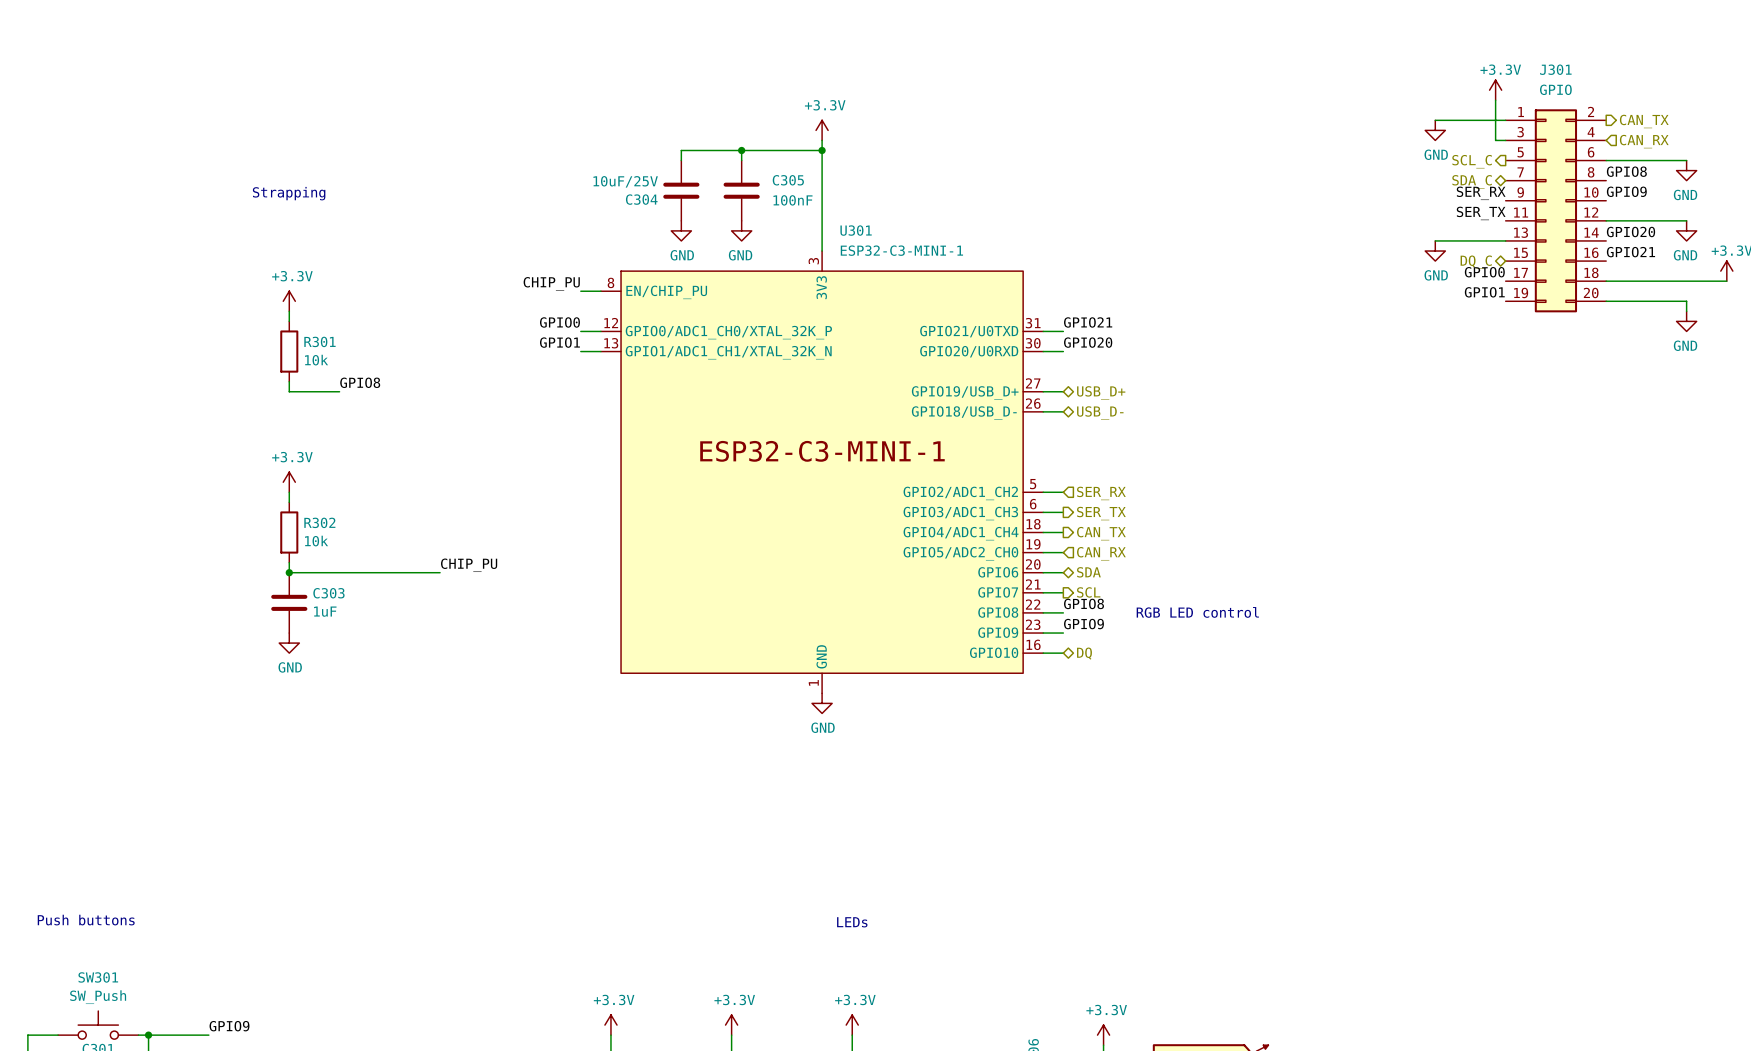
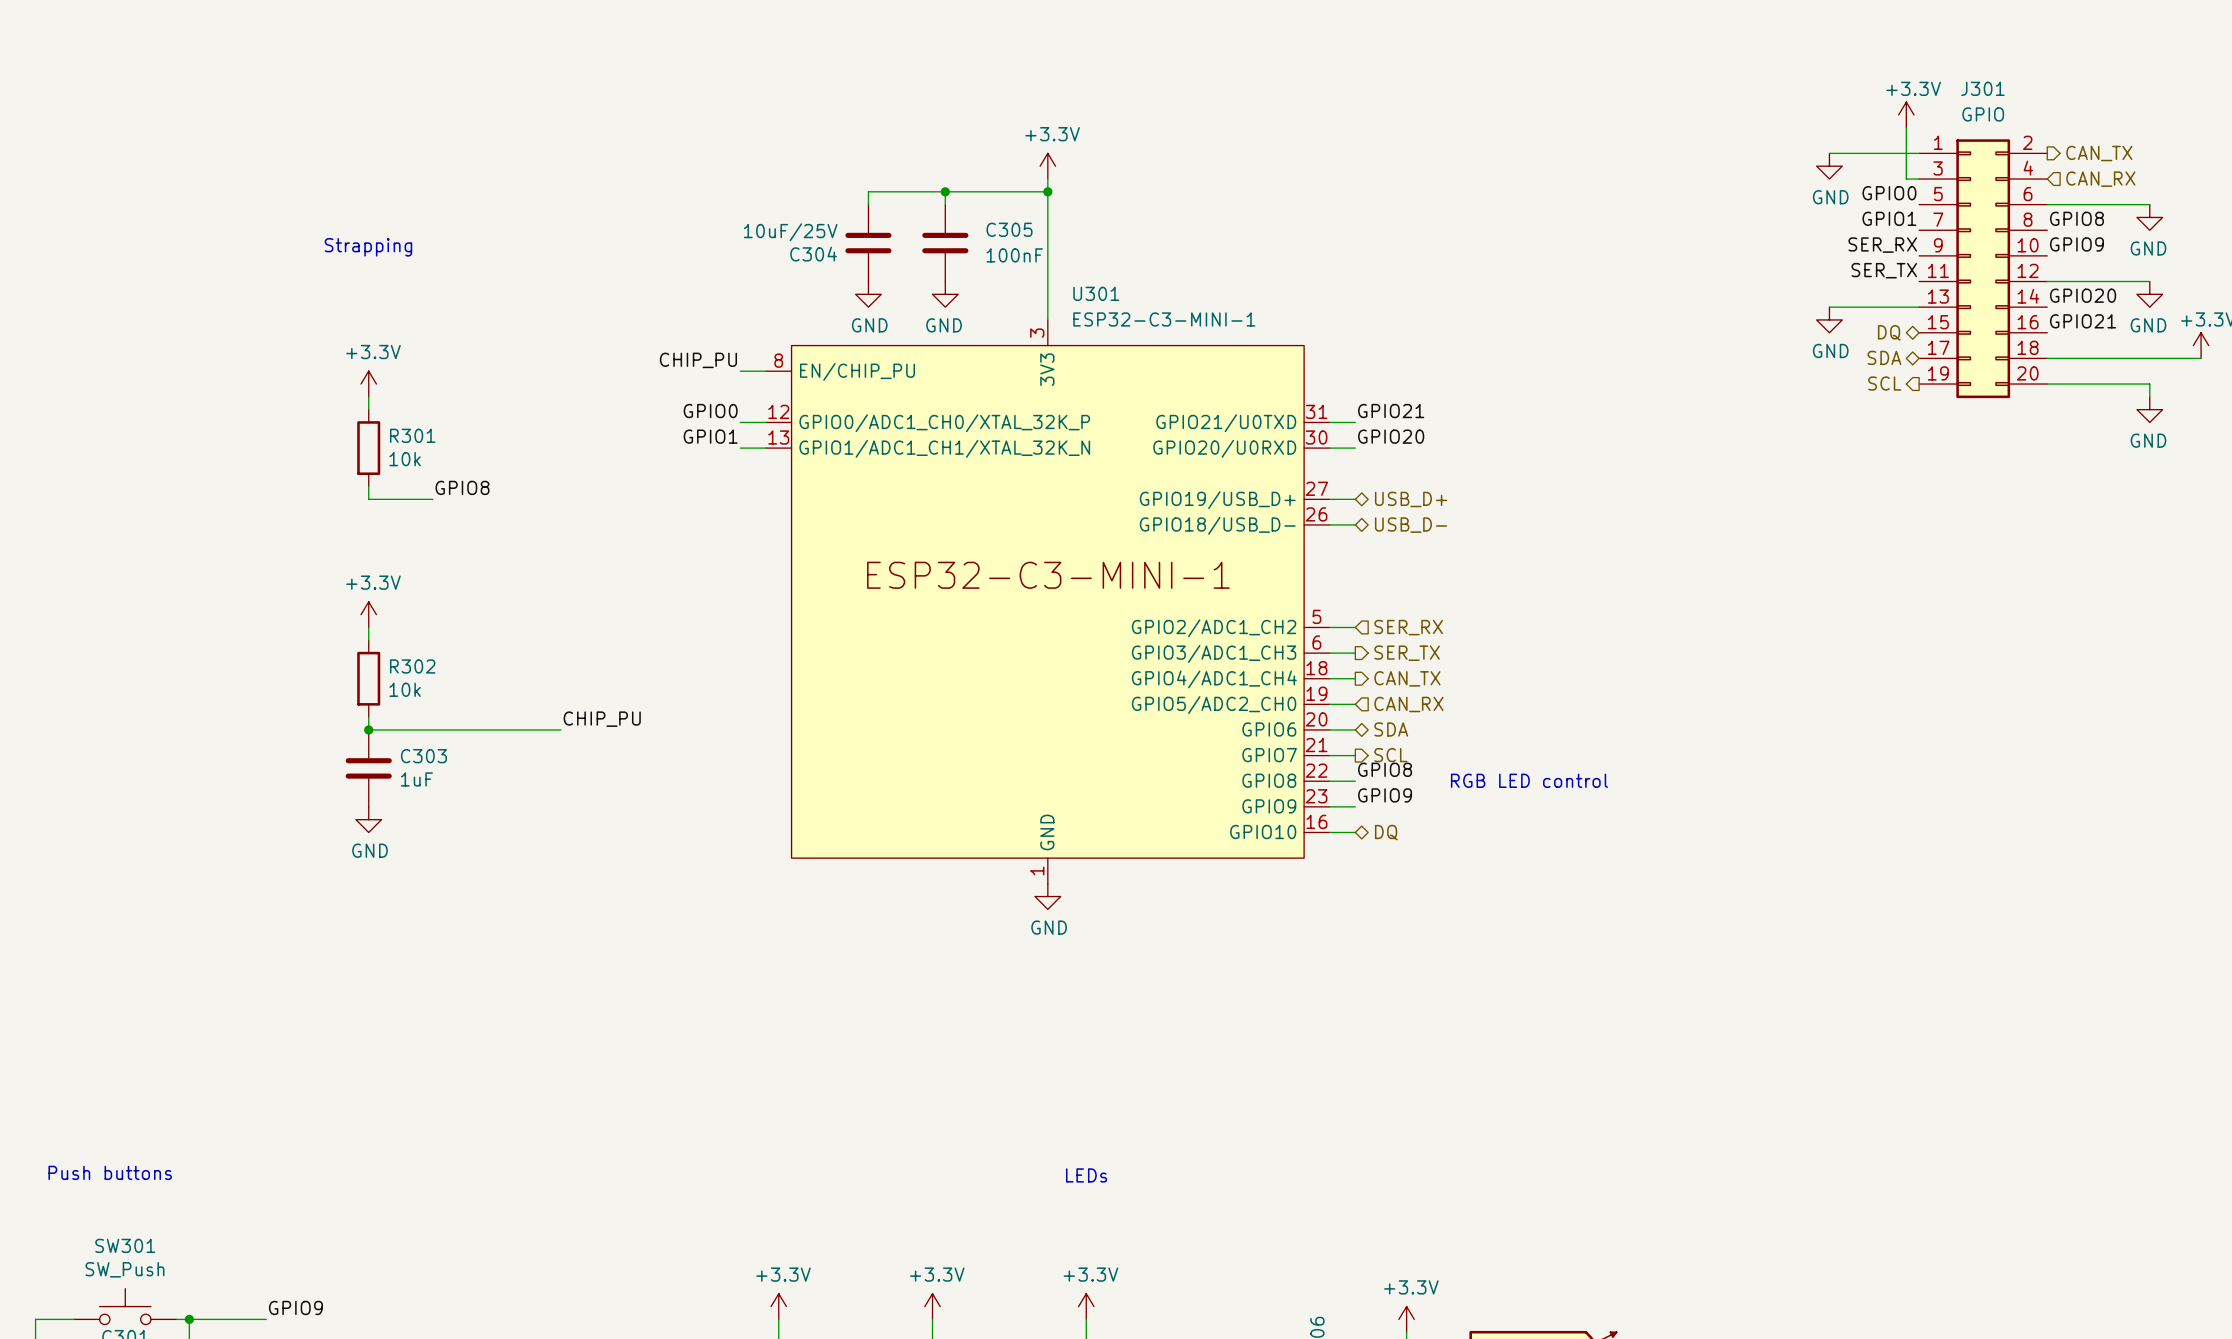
hierarchical label: SCL_C (1472, 161) -> none
hierarchical label: SDA_C (1472, 181) -> none
hierarchical label: DQ_C (1476, 262) -> DQ (1889, 332)
label position: GPIO0 (1484, 272) -> GPIO0 (1889, 193)
hierarchical label: none -> SDA (1884, 357)
label position: GPIO1 (1484, 292) -> GPIO1 (1889, 218)
hierarchical label: none -> SCL (1884, 383)

